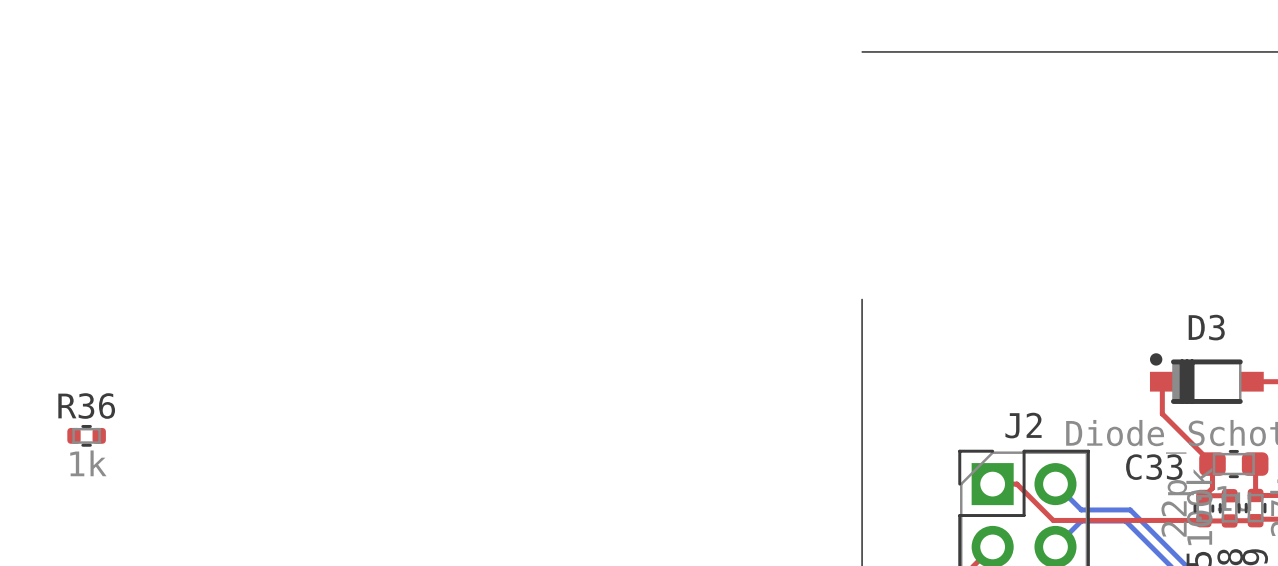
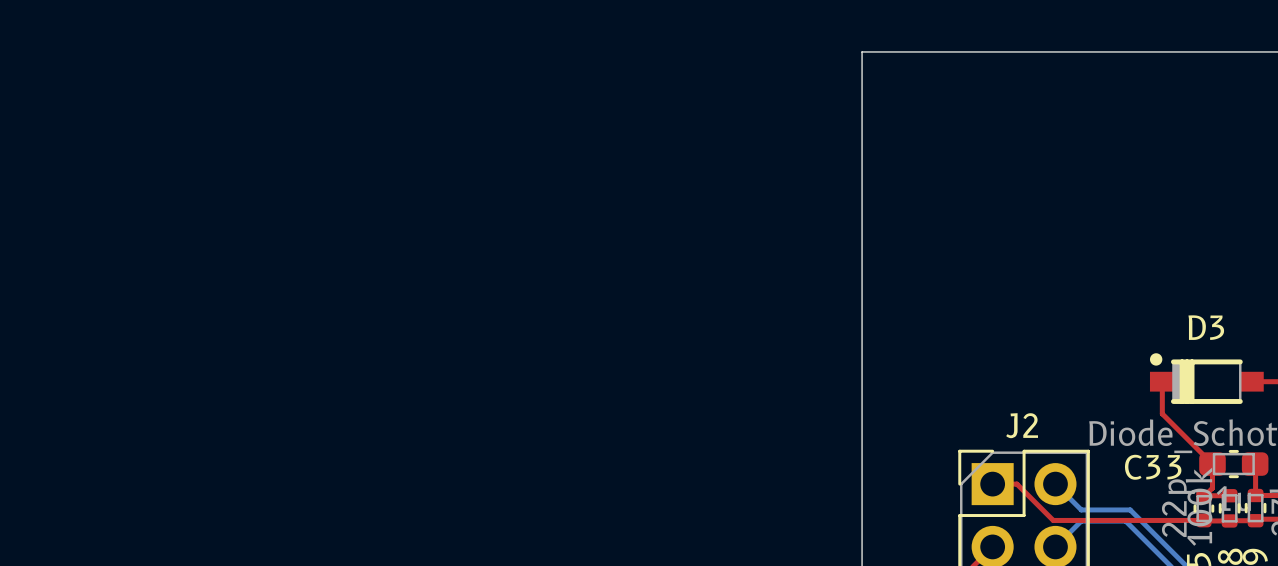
board edge: none -> (862, 51) (862, 299)
R36: 1k (86, 435) -> none

